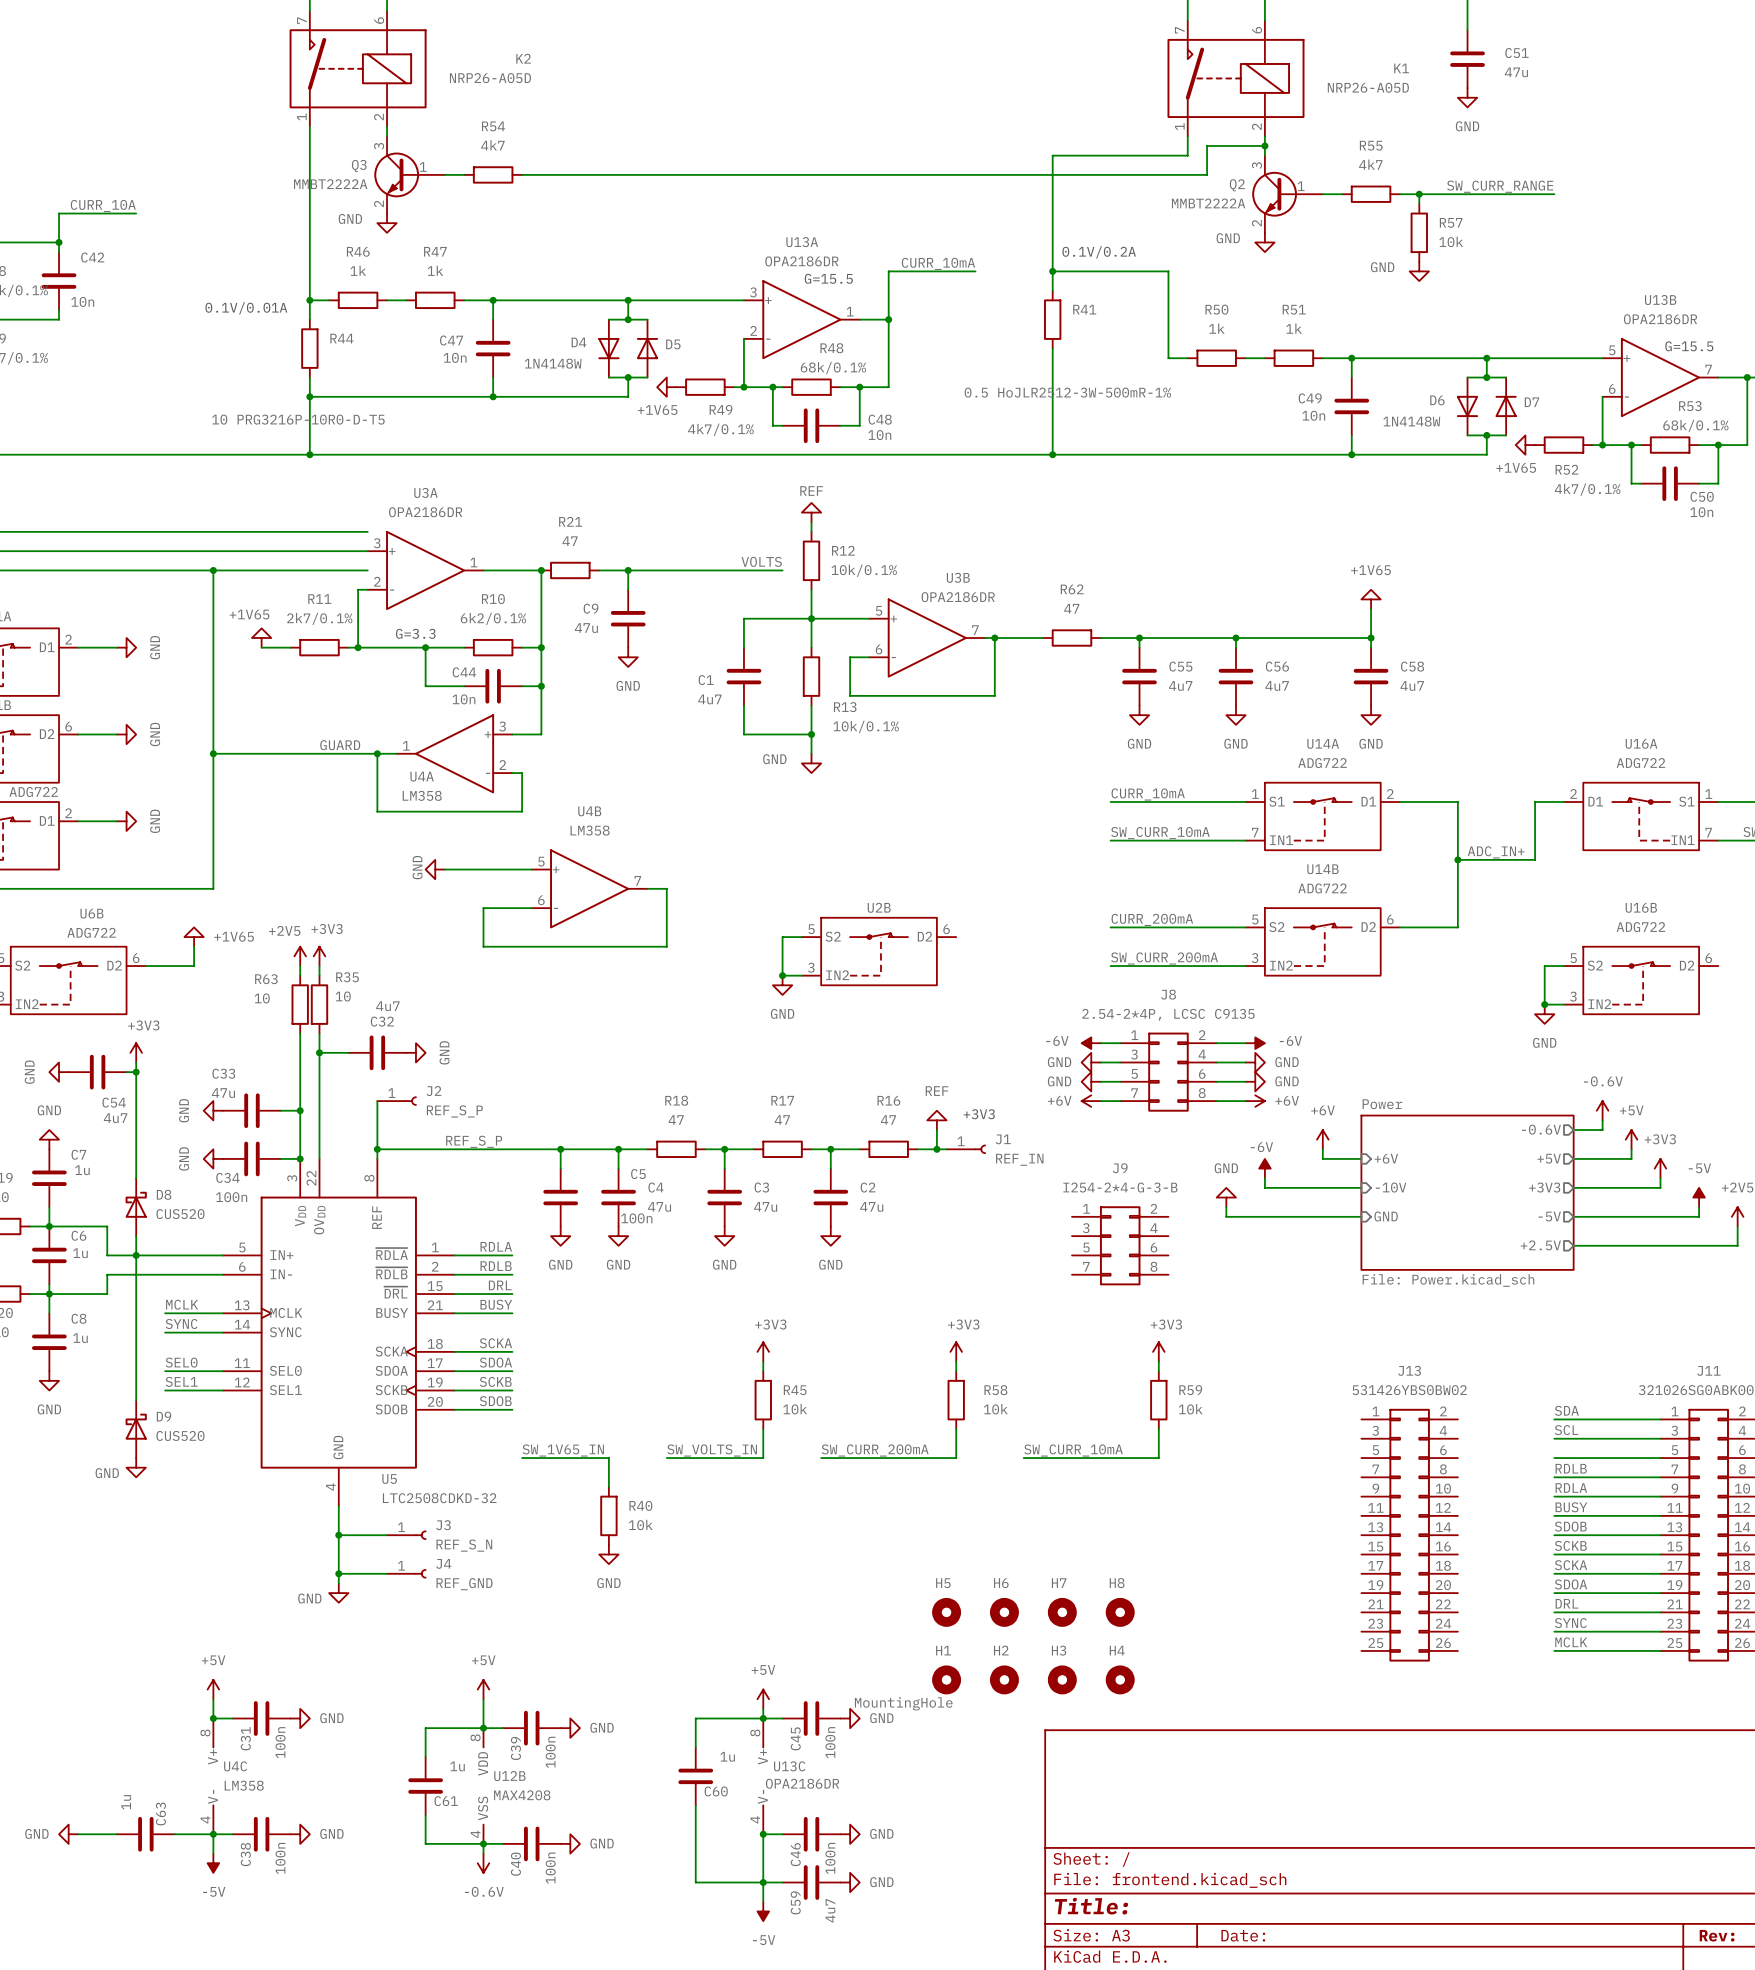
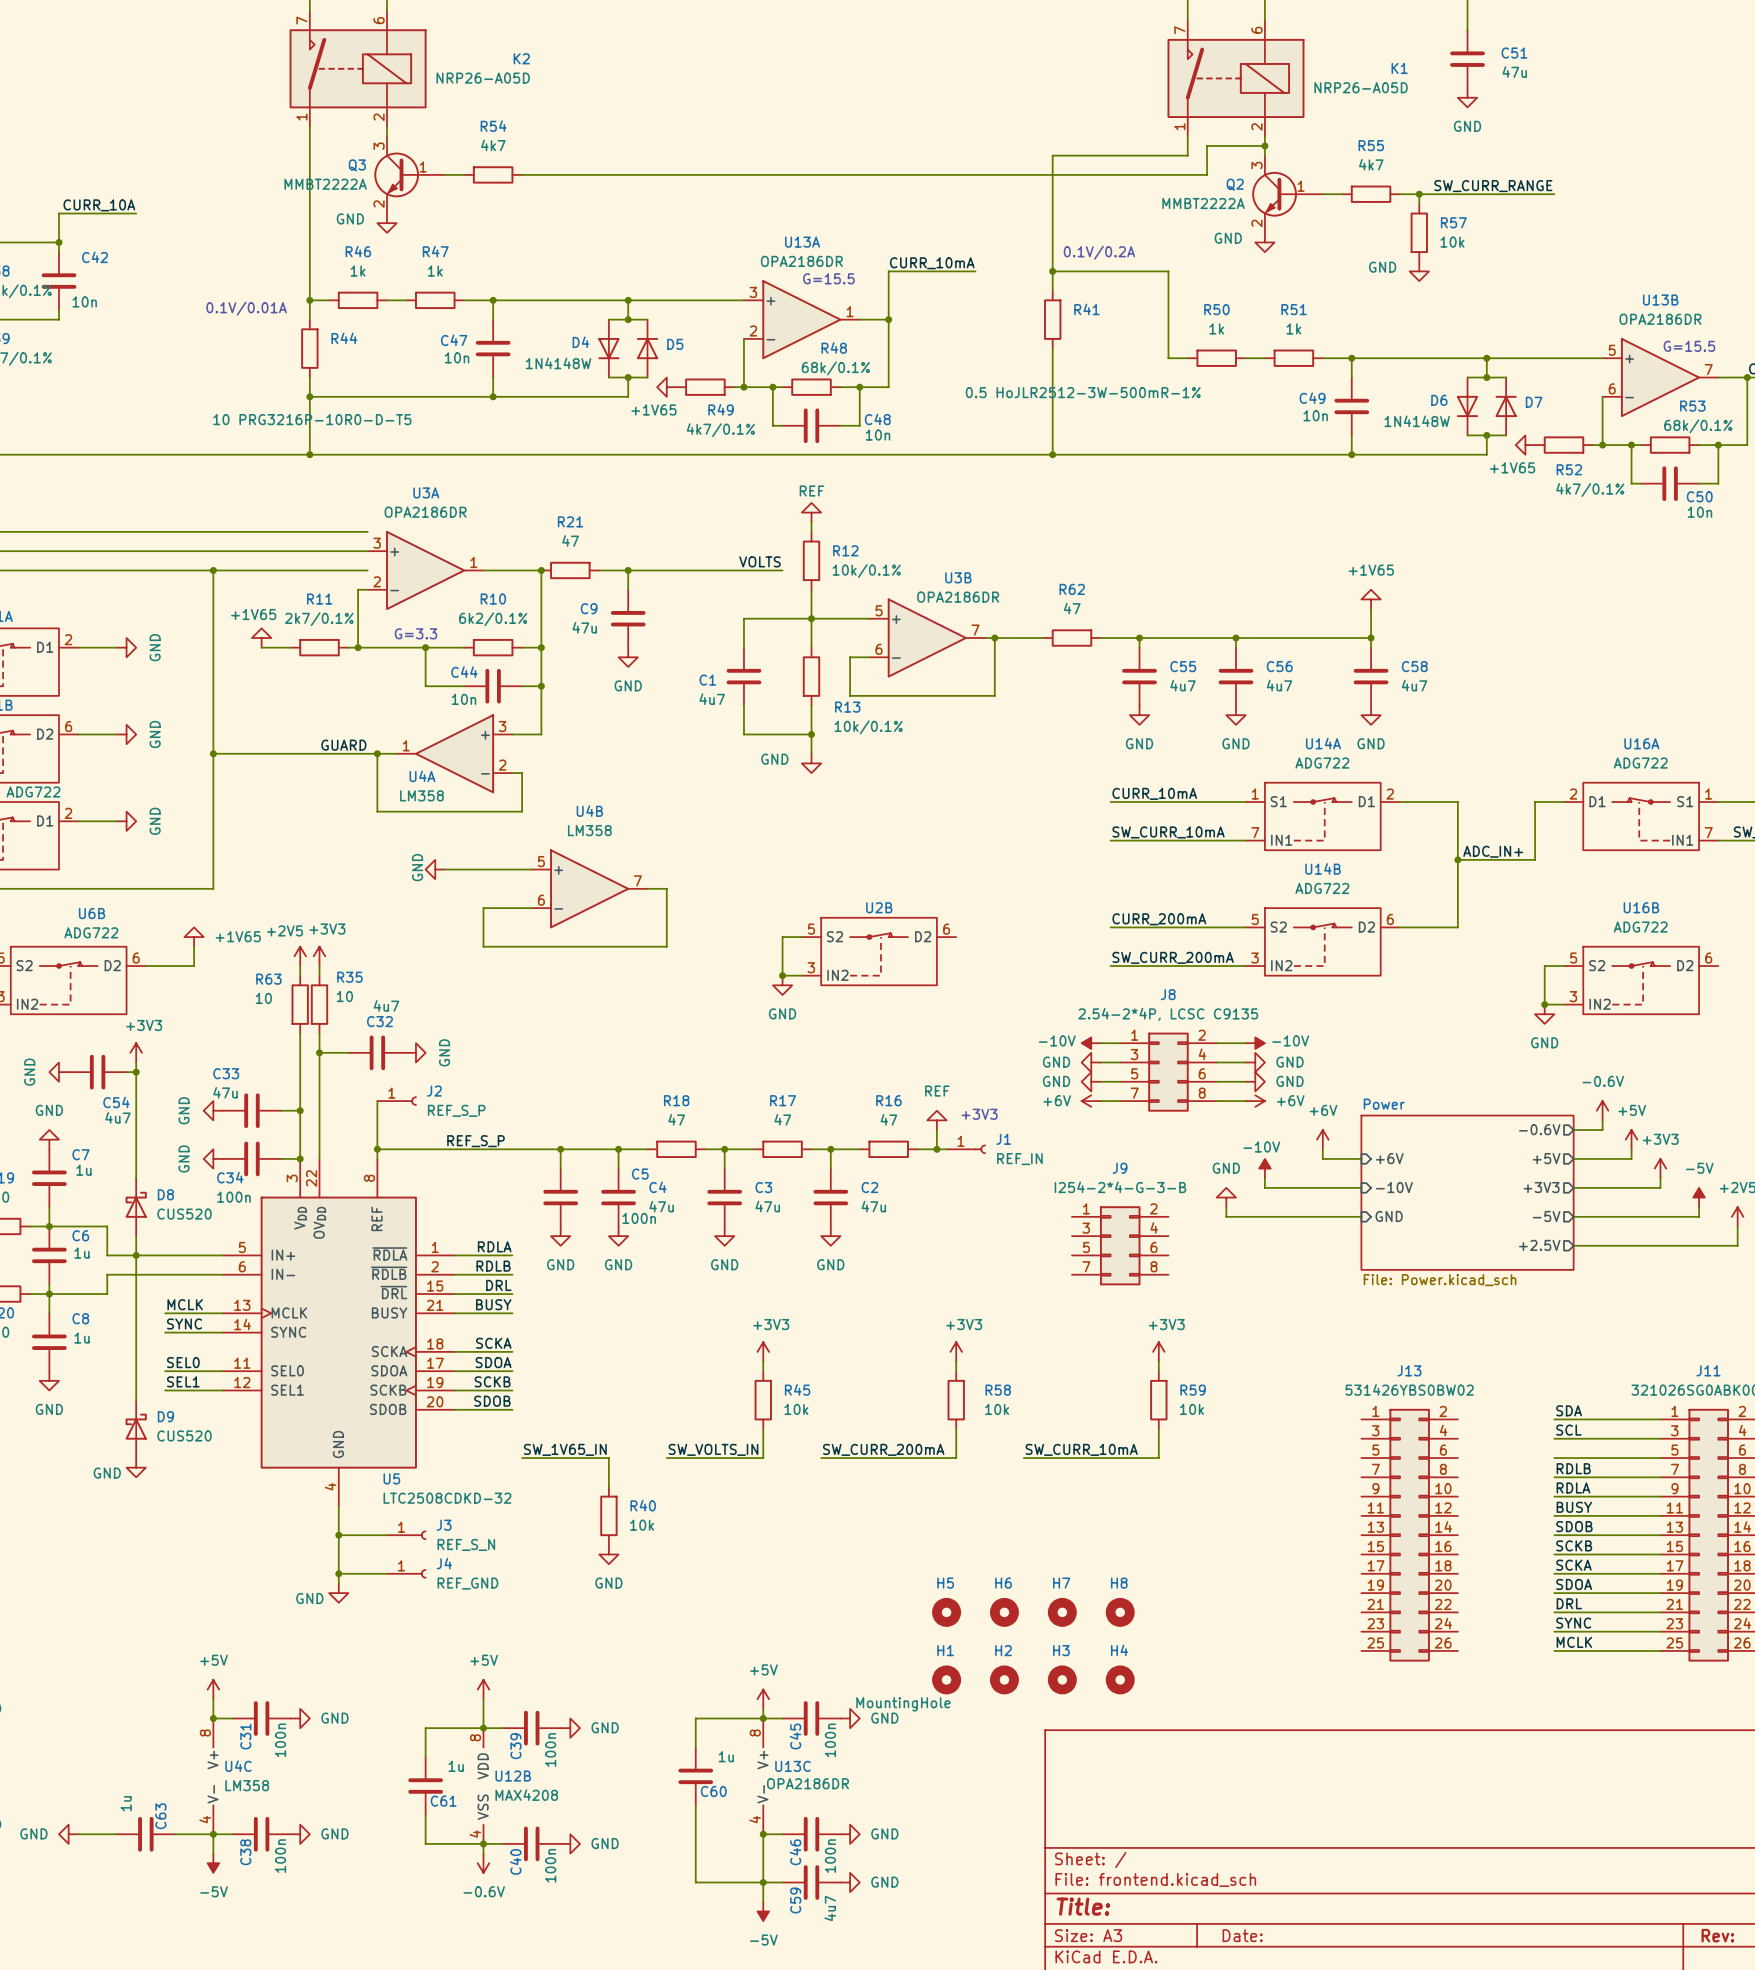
power symbol: -6V (1091, 1043) -> -10V (1091, 1043)
power symbol: -6V (1255, 1043) -> -10V (1255, 1043)
power symbol: -6V (1264, 1168) -> -10V (1264, 1168)

